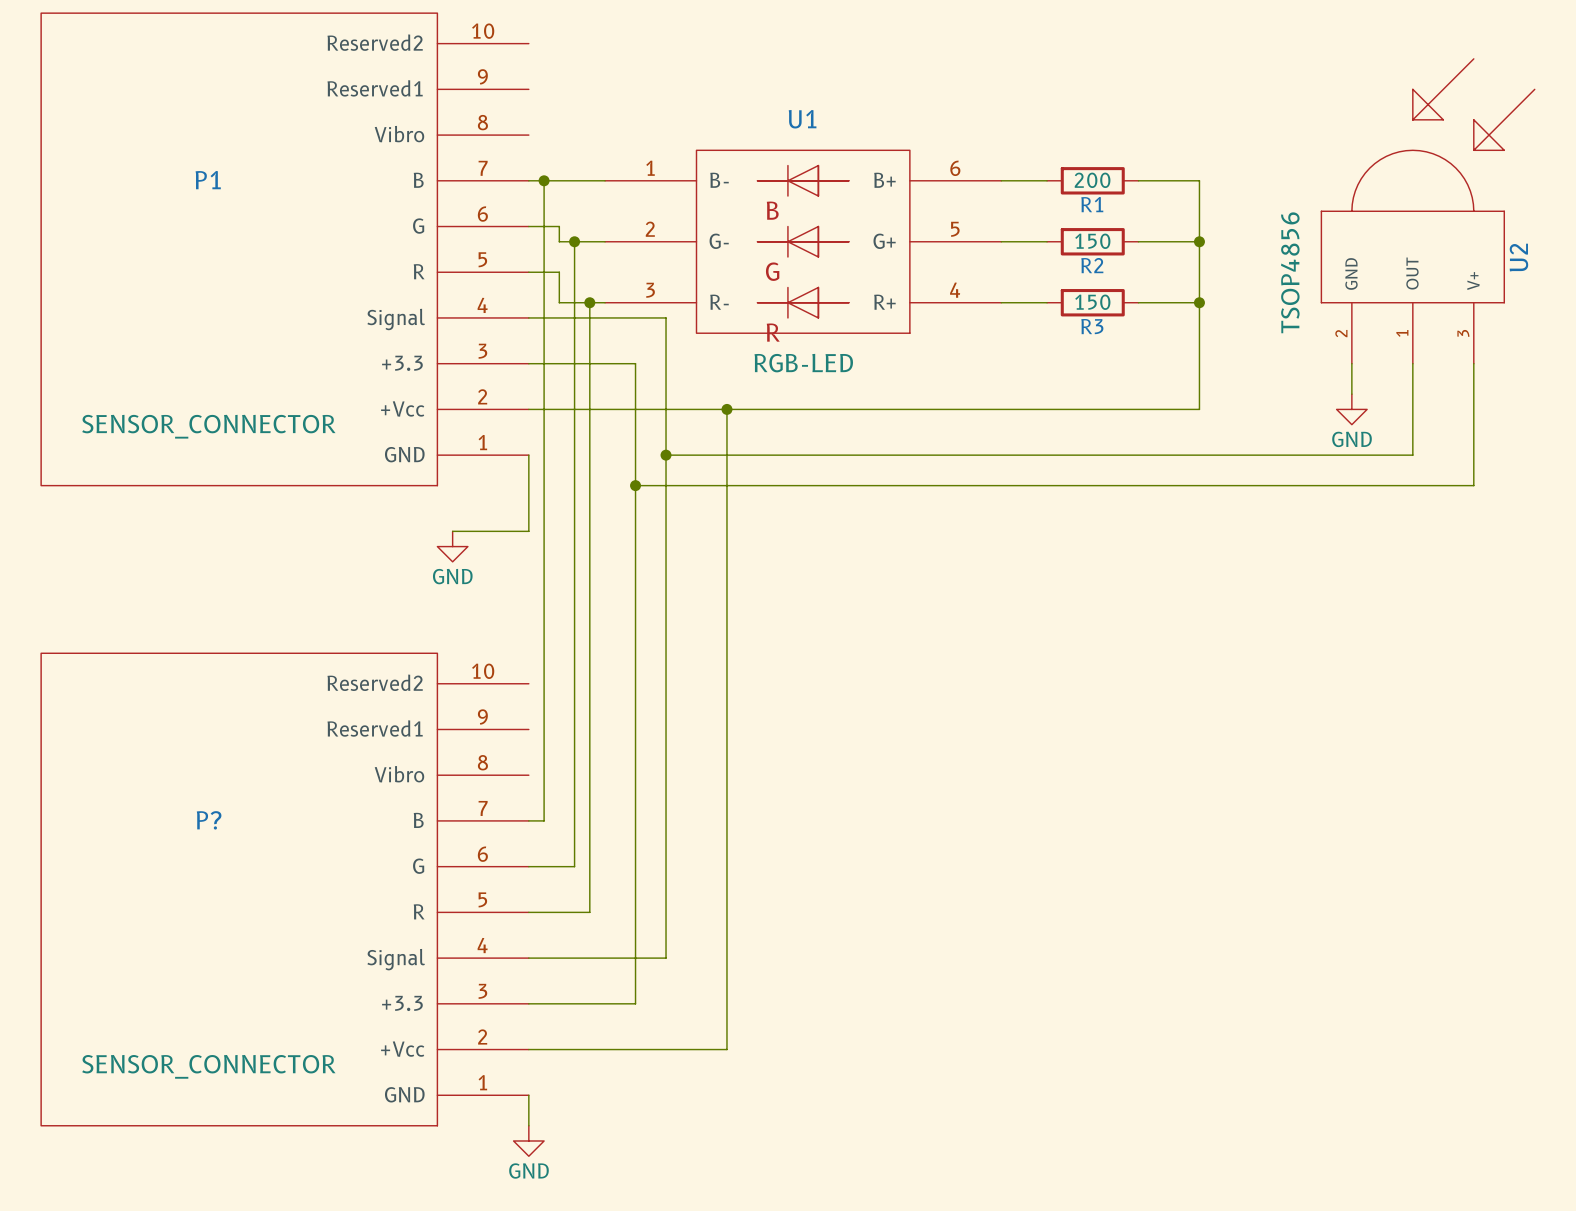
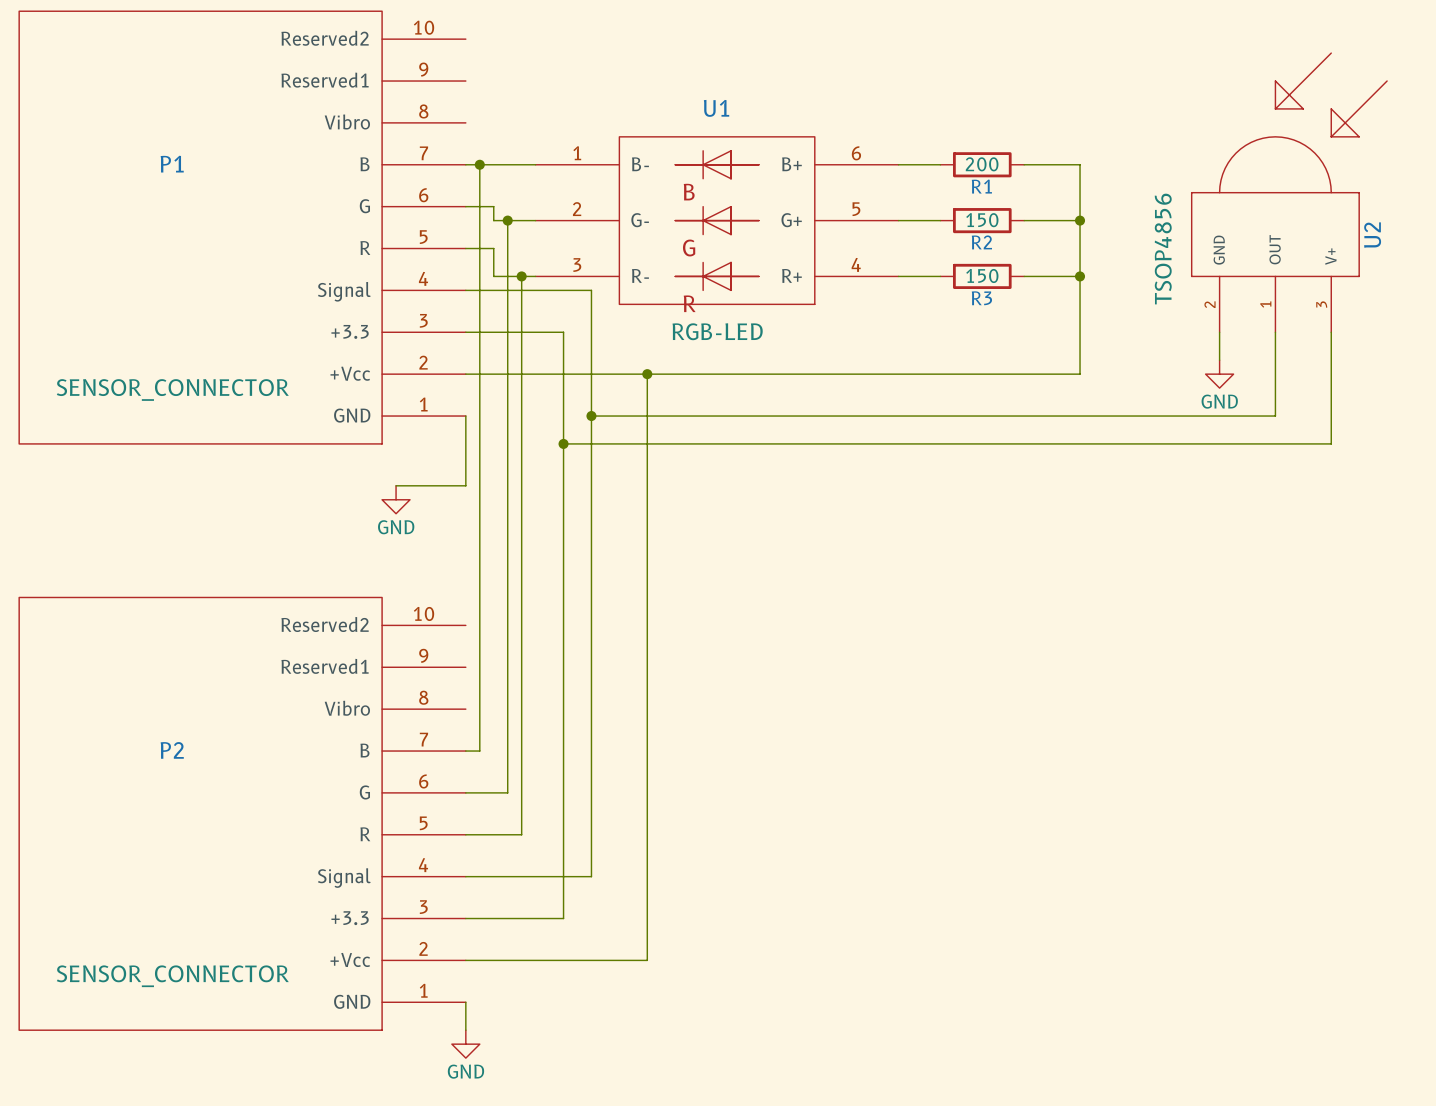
P? name: P? (209, 820) -> P2 (172, 750)

